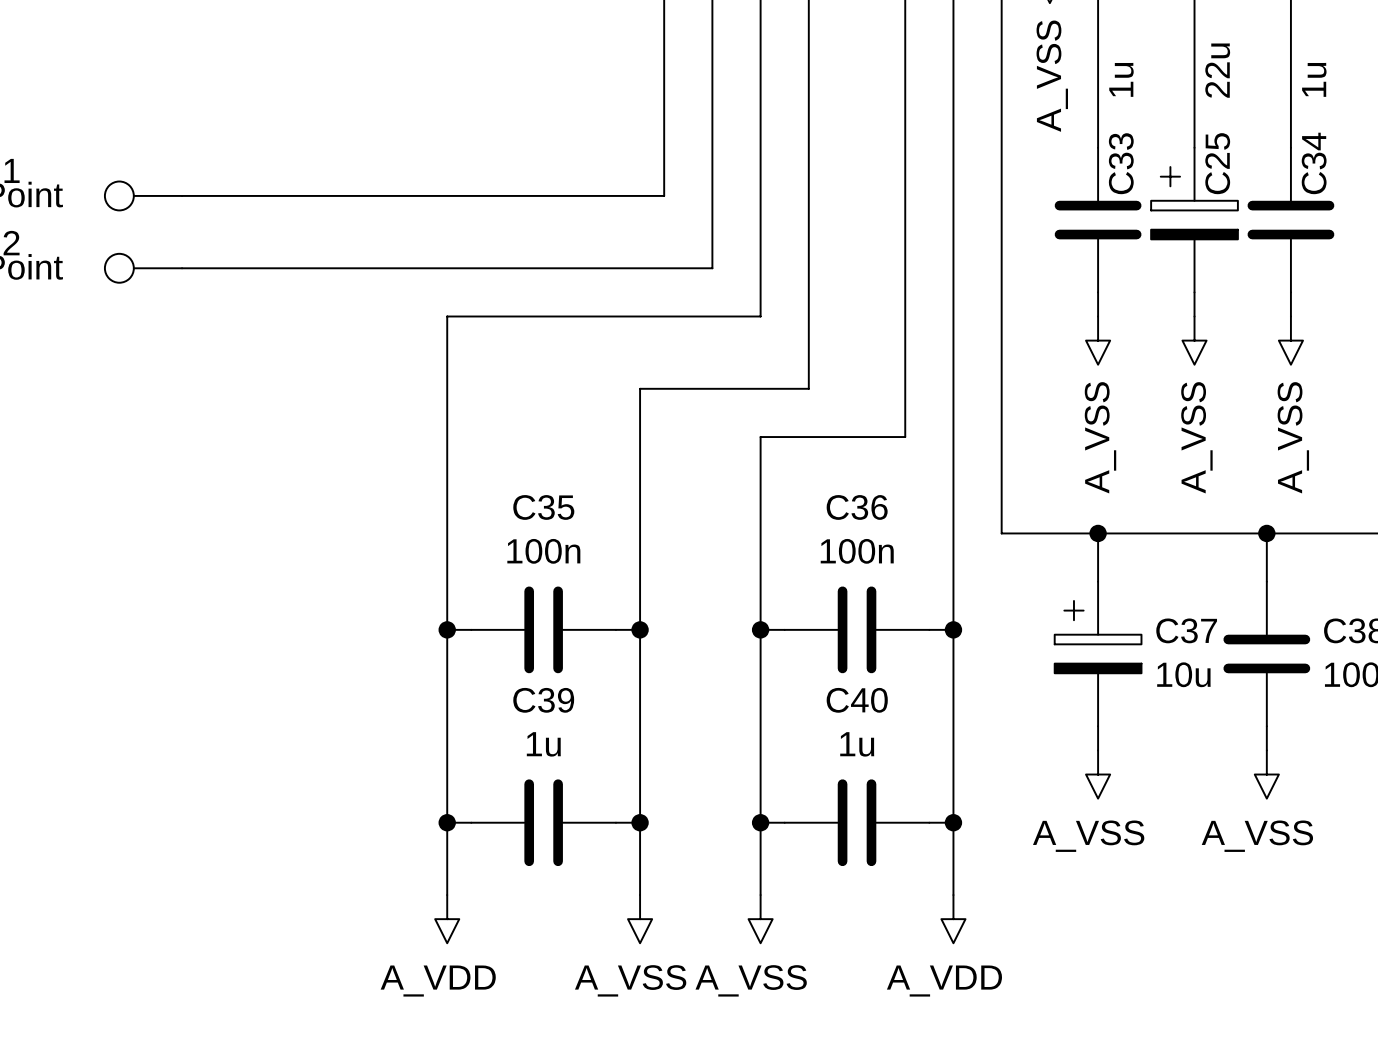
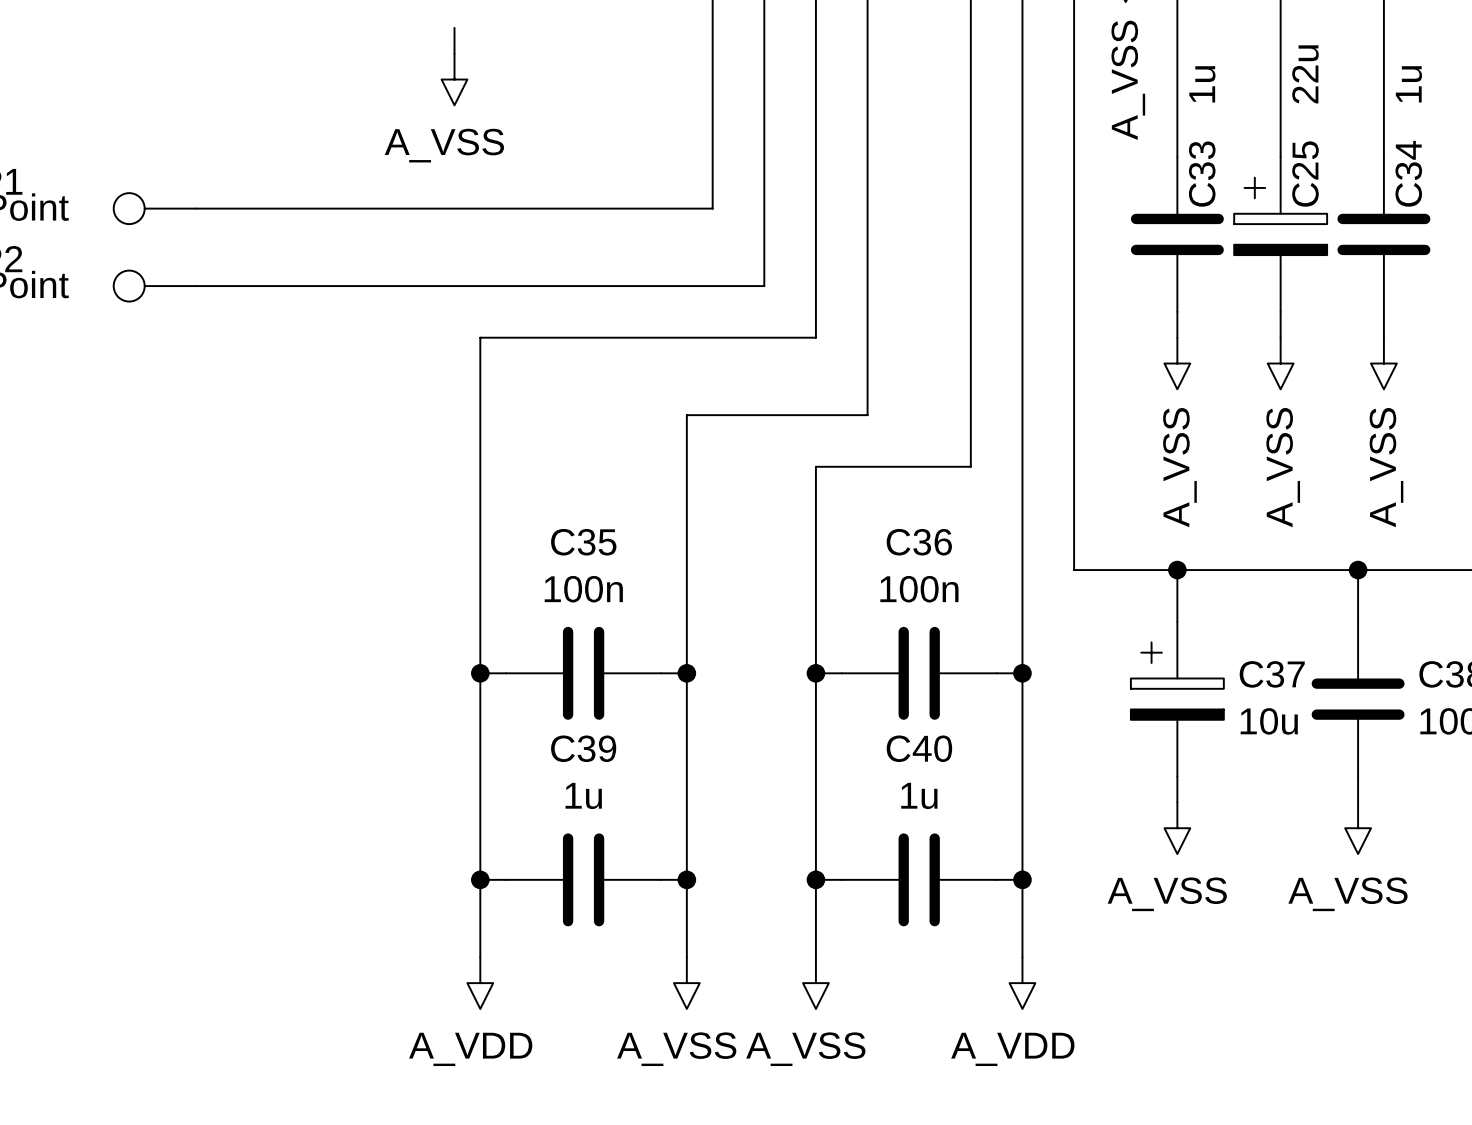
wire: none -> (454, 27) (454, 53)
power symbol: none -> A_VSS (454, 79)

